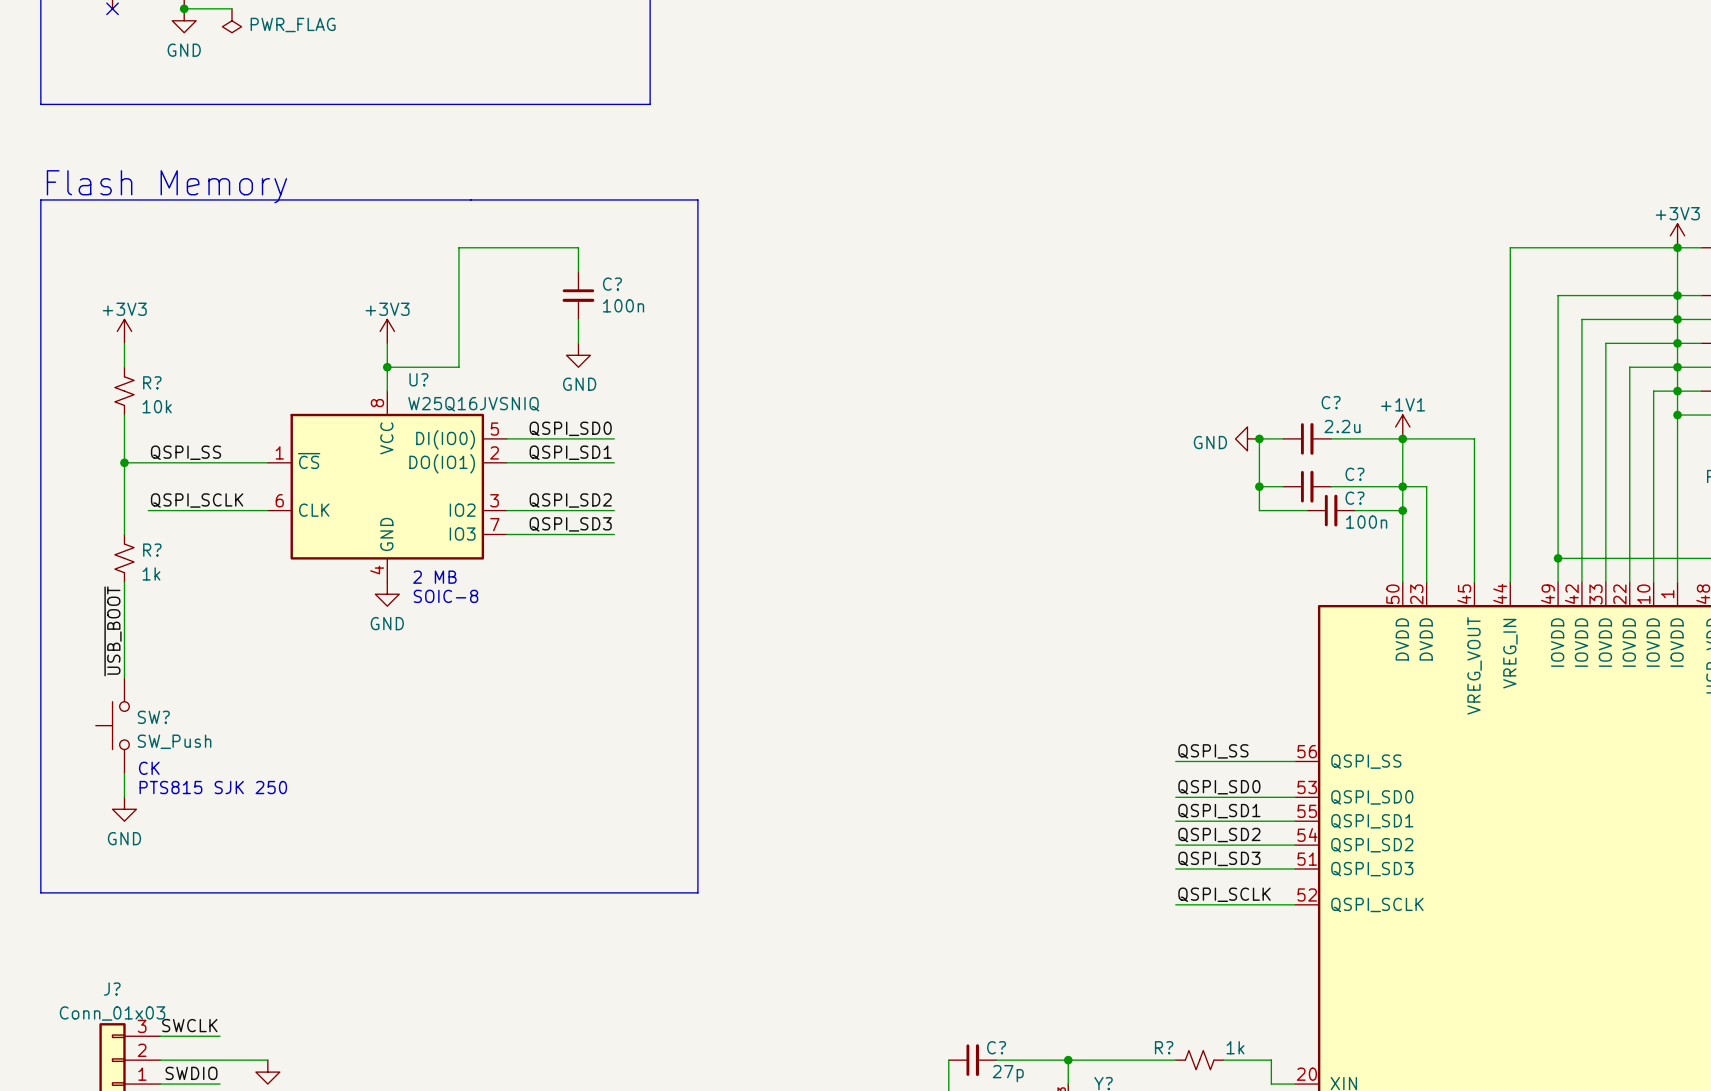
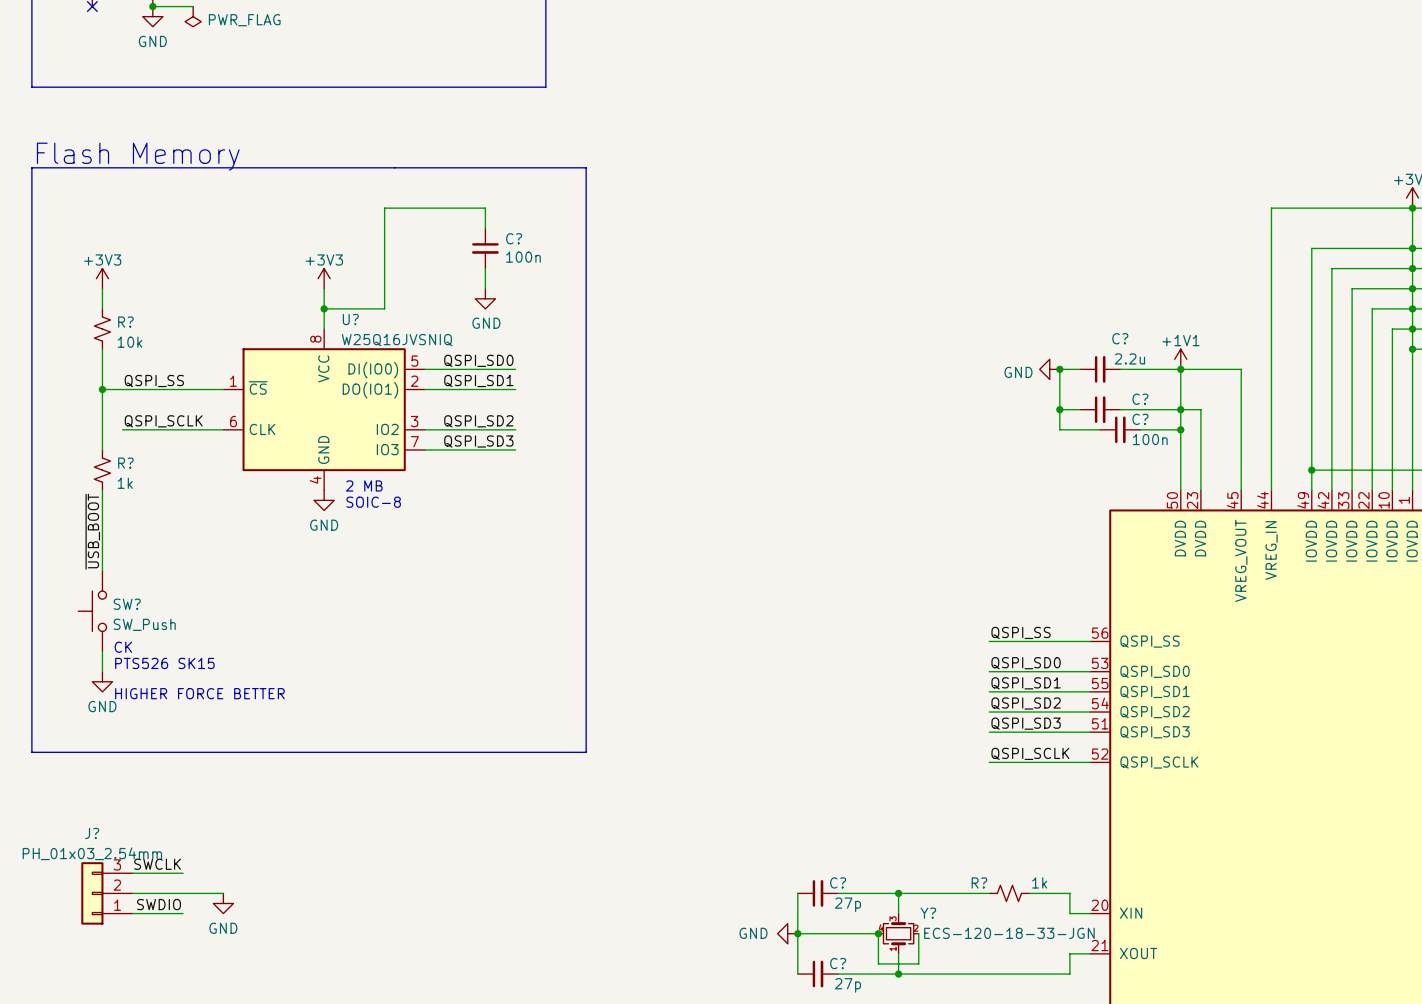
text: PTS815 SJK 250 (213, 787) -> PTS526 SK15 (164, 663)
text: none -> HIGHER FORCE BETTER (199, 693)
J? value: Conn_01x03 (112, 1013) -> PH_01x03_2.54mm (92, 853)

